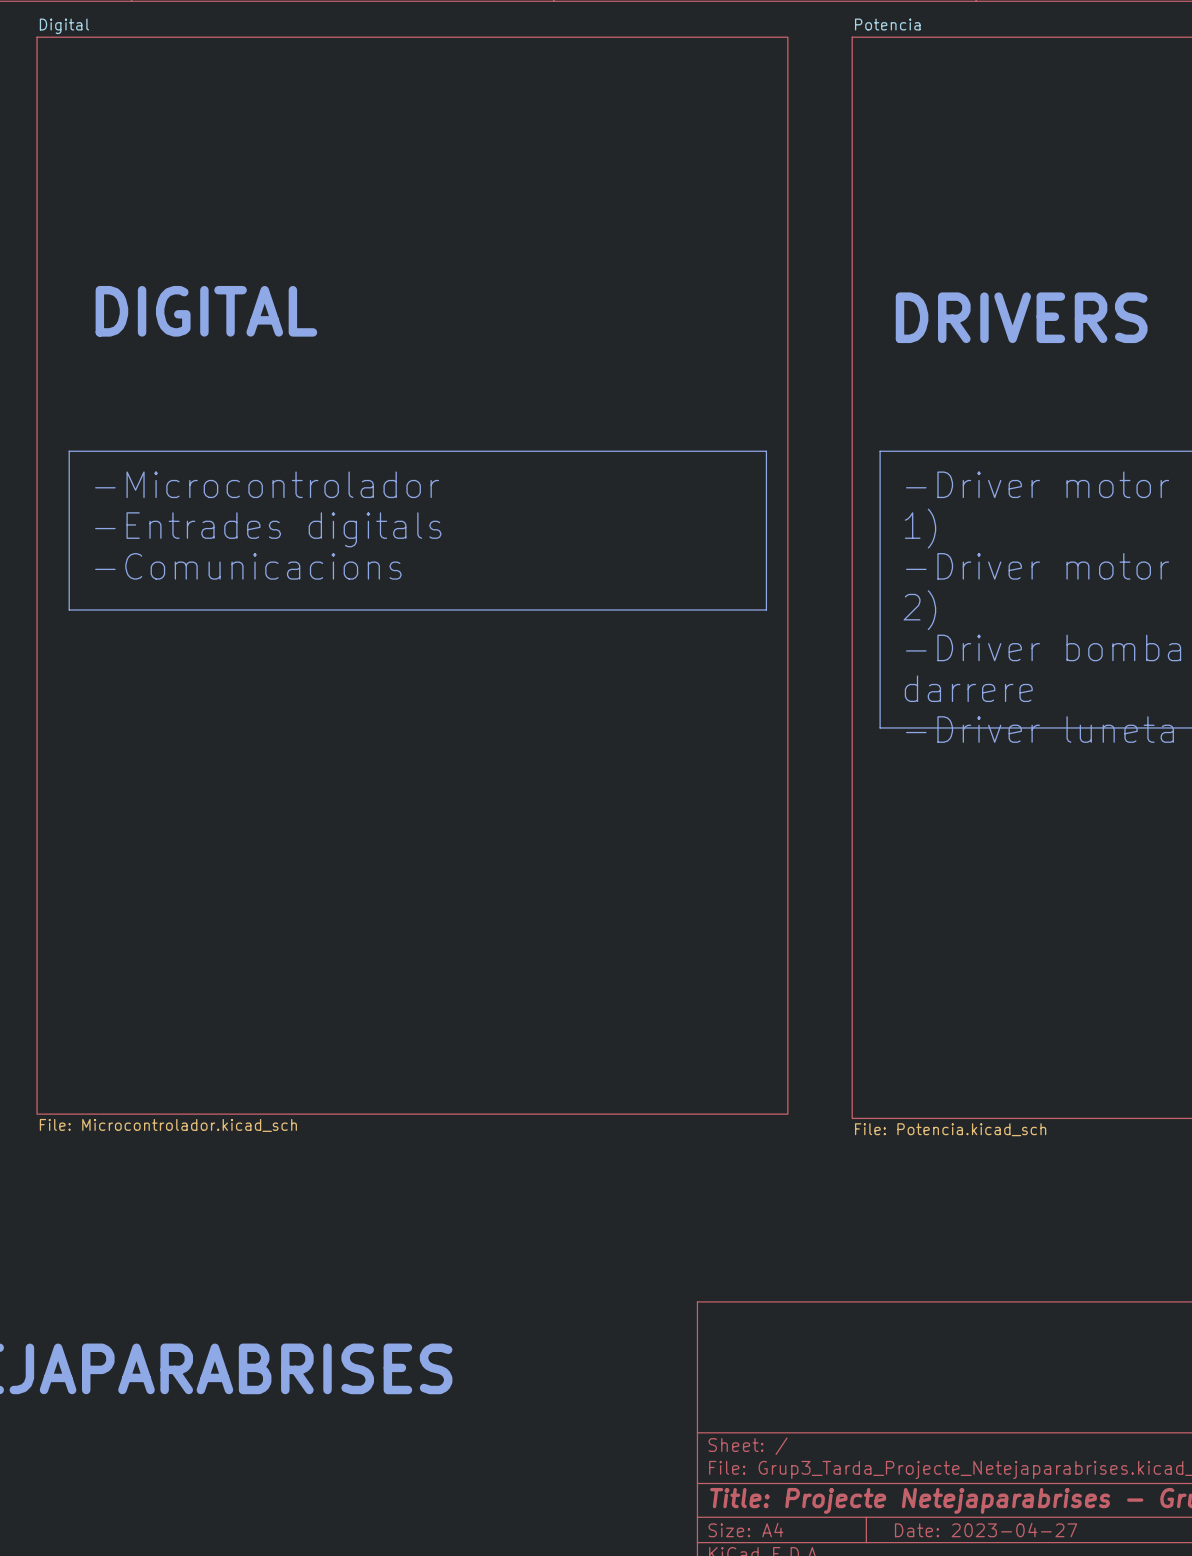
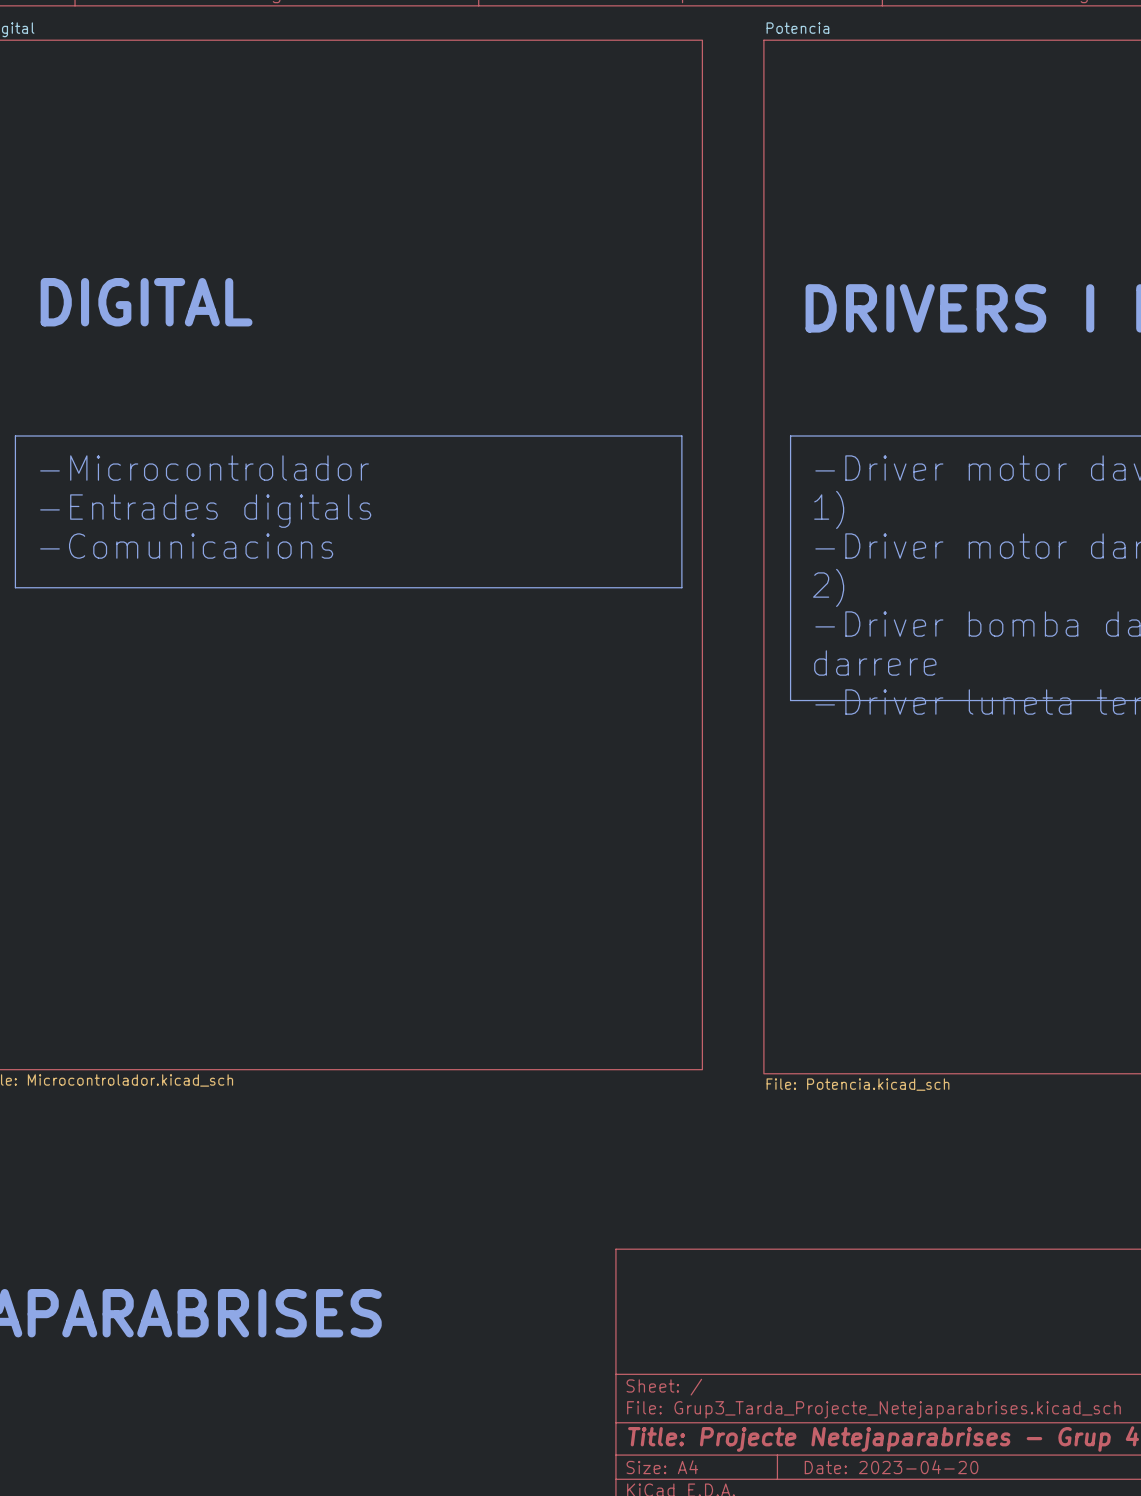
title block: Date: 2023-04-27 (986, 1530) -> Date: 2023-04-20 (891, 1467)

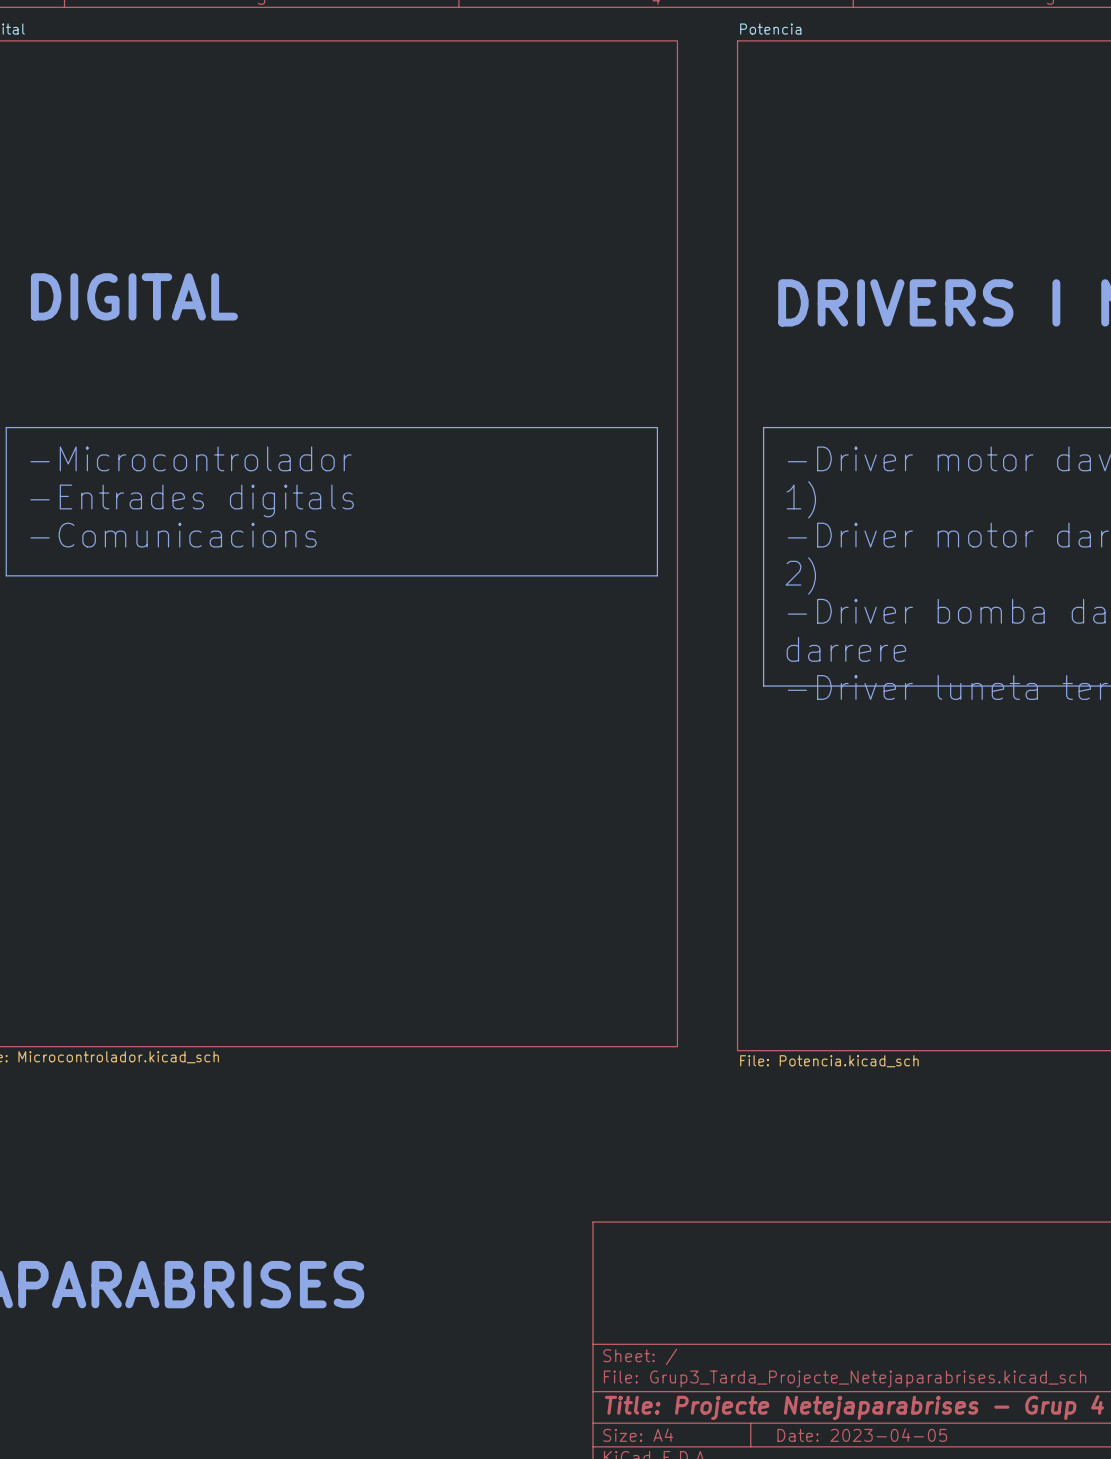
title block: Date: 2023-04-20 (891, 1467) -> Date: 2023-04-05 (862, 1435)

